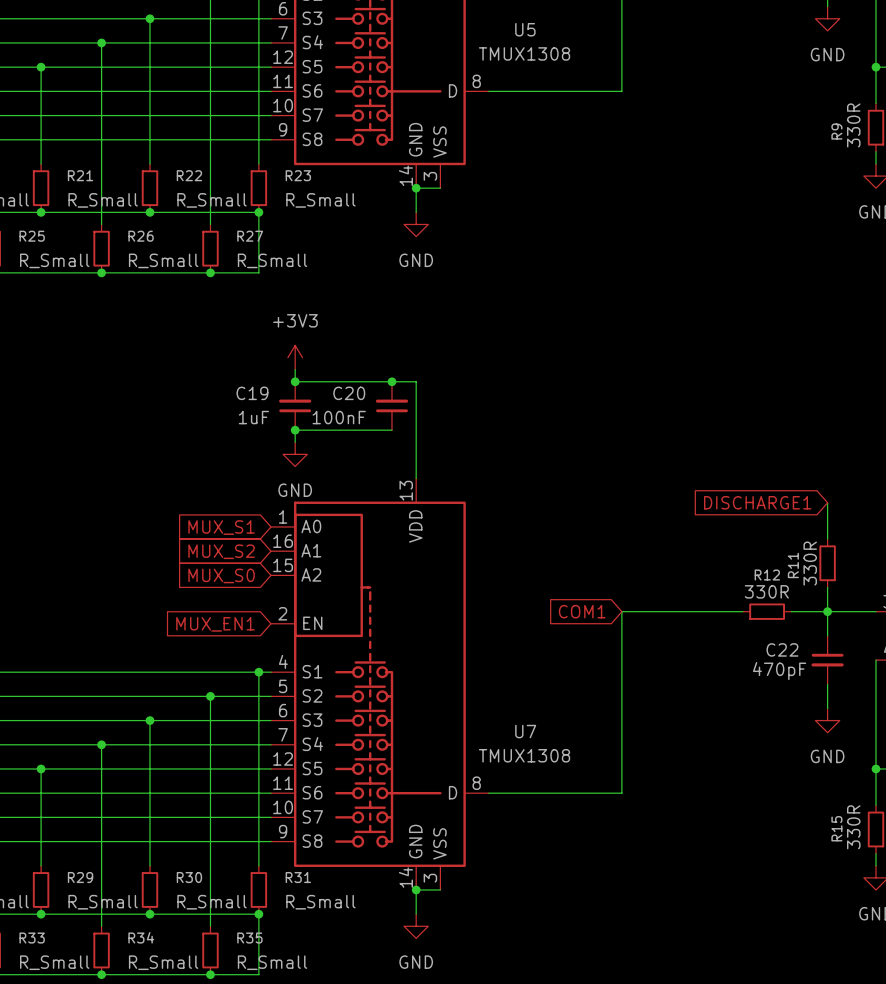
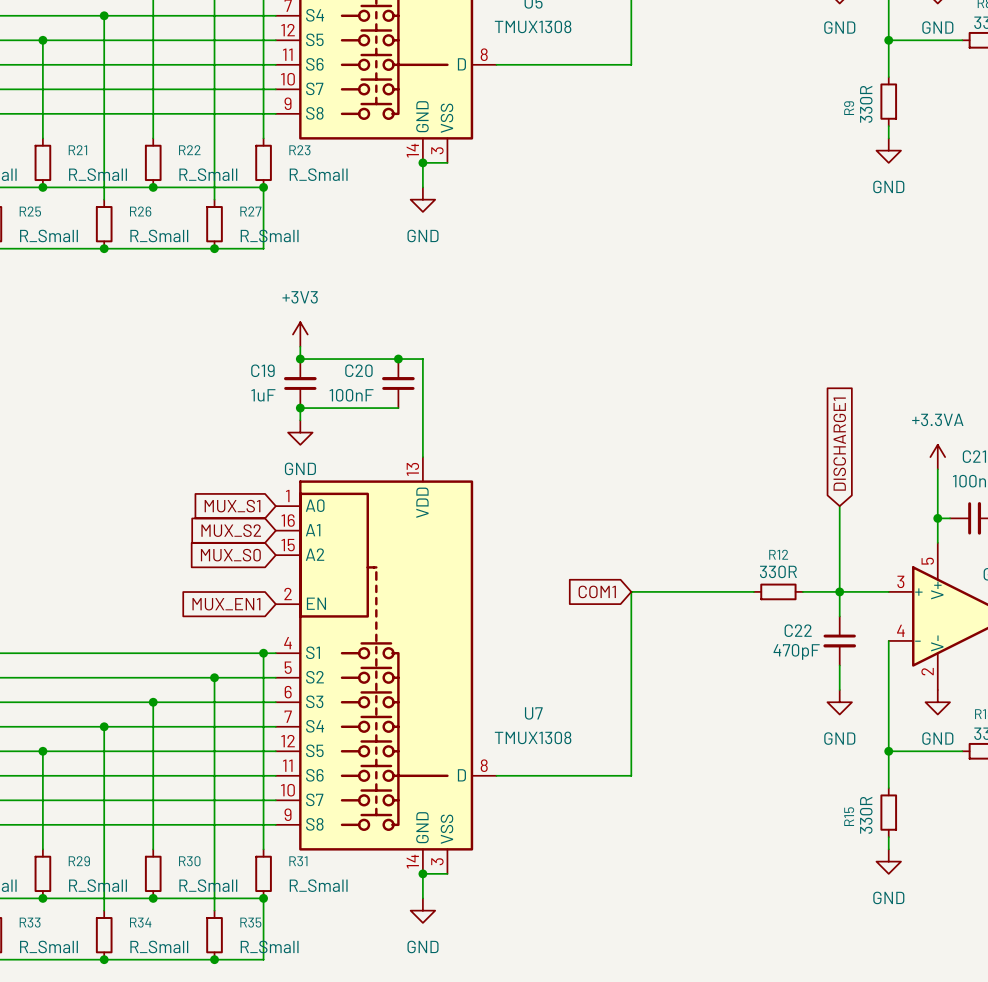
global label rotation: 0° (757, 502) -> 90° clockwise (839, 444)
wire: (827, 502) (827, 526) -> none
wire: none -> (839, 518) (839, 567)
R11: 330R (827, 563) -> none

